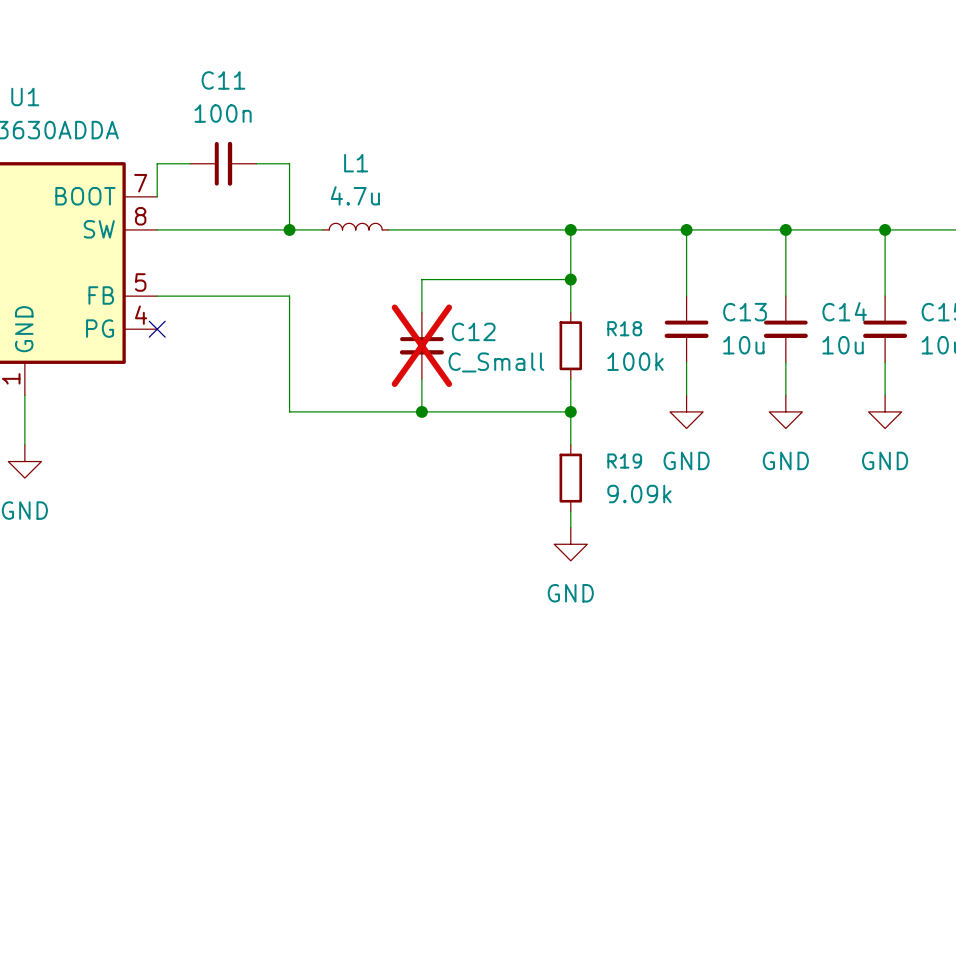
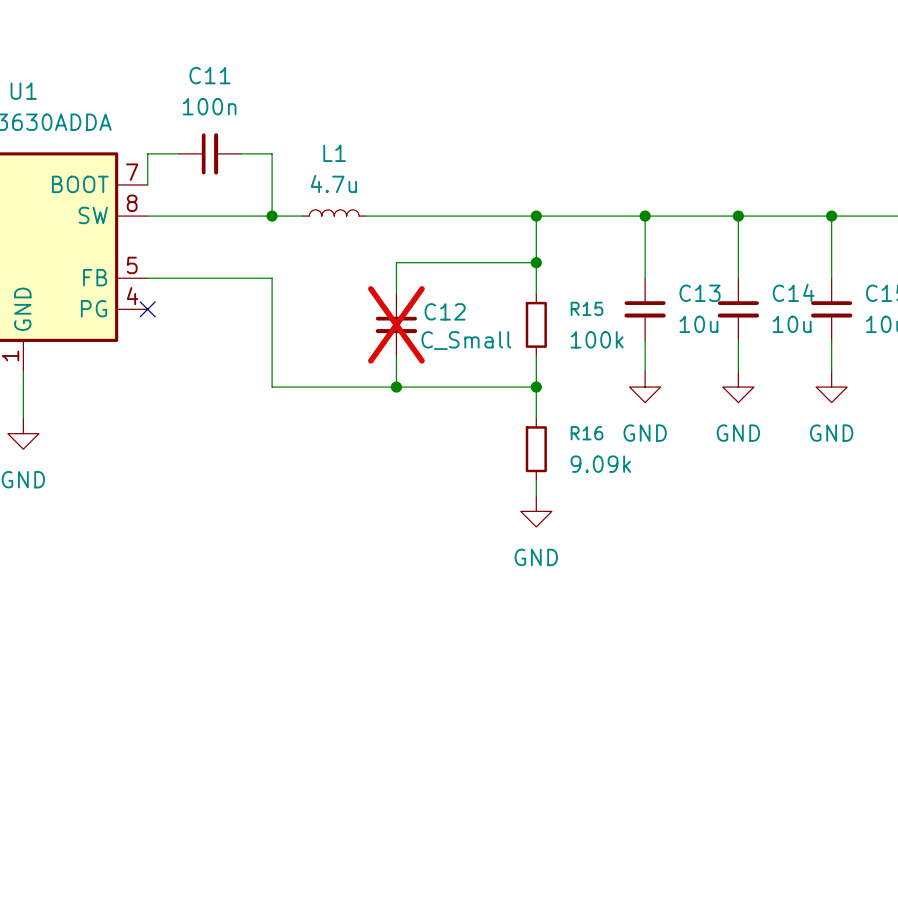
R18 name: R18 (624, 328) -> R15 (586, 308)
R19 name: R19 (624, 461) -> R16 (586, 433)

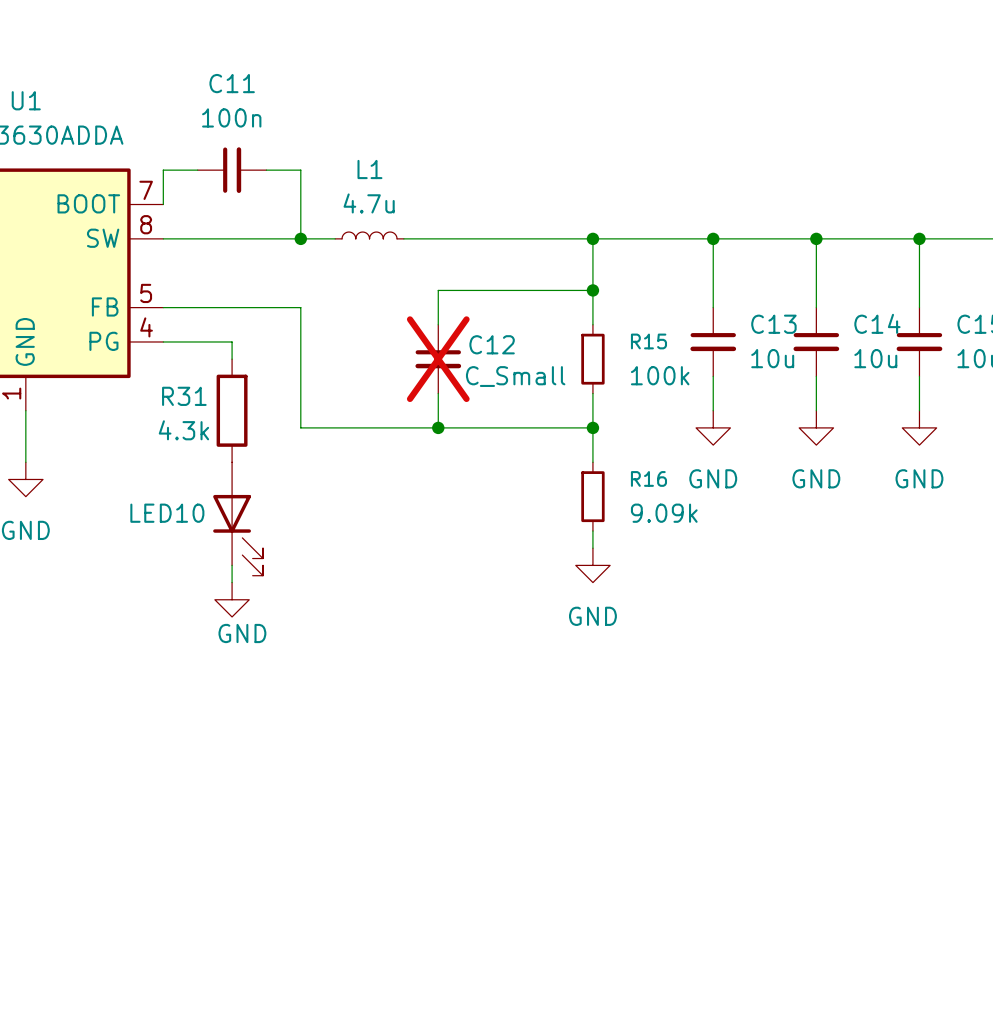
wire: none -> (163, 341) (232, 341) (232, 359)
no-connect mark: (147, 309) -> none
R31: none -> 4.3k (232, 410)
LED10: none -> (238, 519)
wire: none -> (232, 565) (232, 582)
power symbol: none -> GND (232, 599)

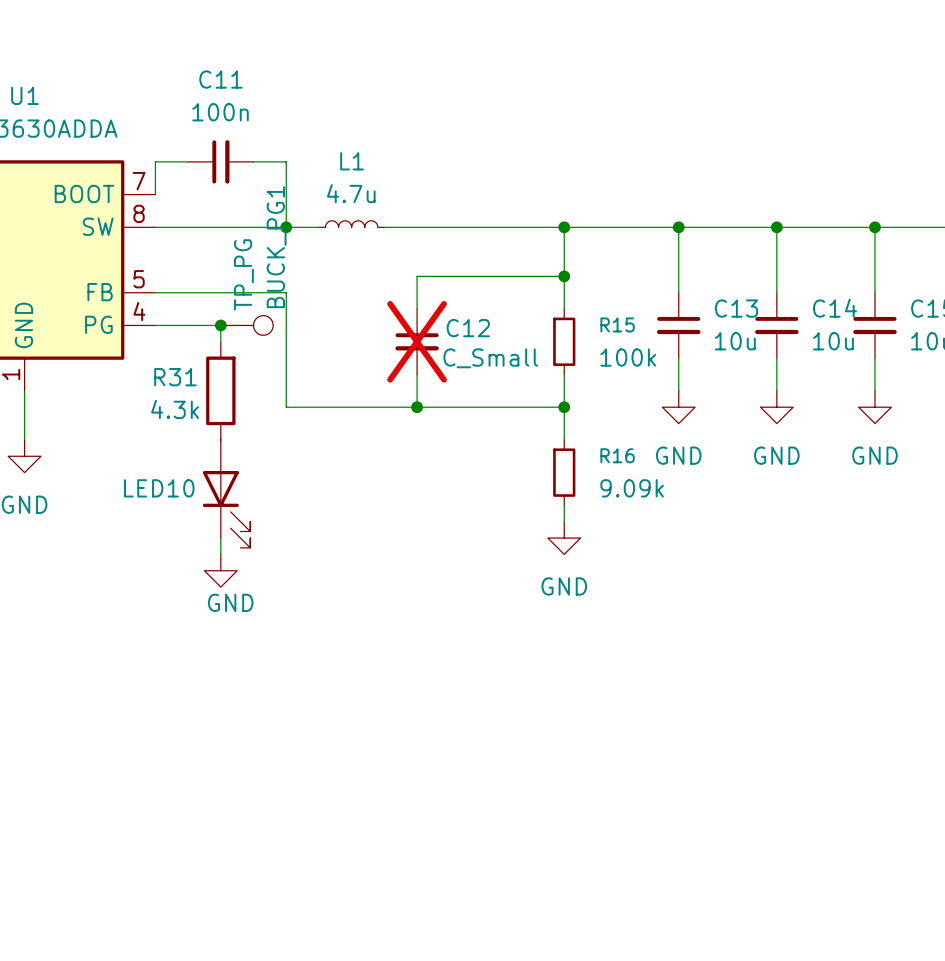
junction: none -> (220, 325)
BUCK_PG1: none -> TP_PG (247, 325)

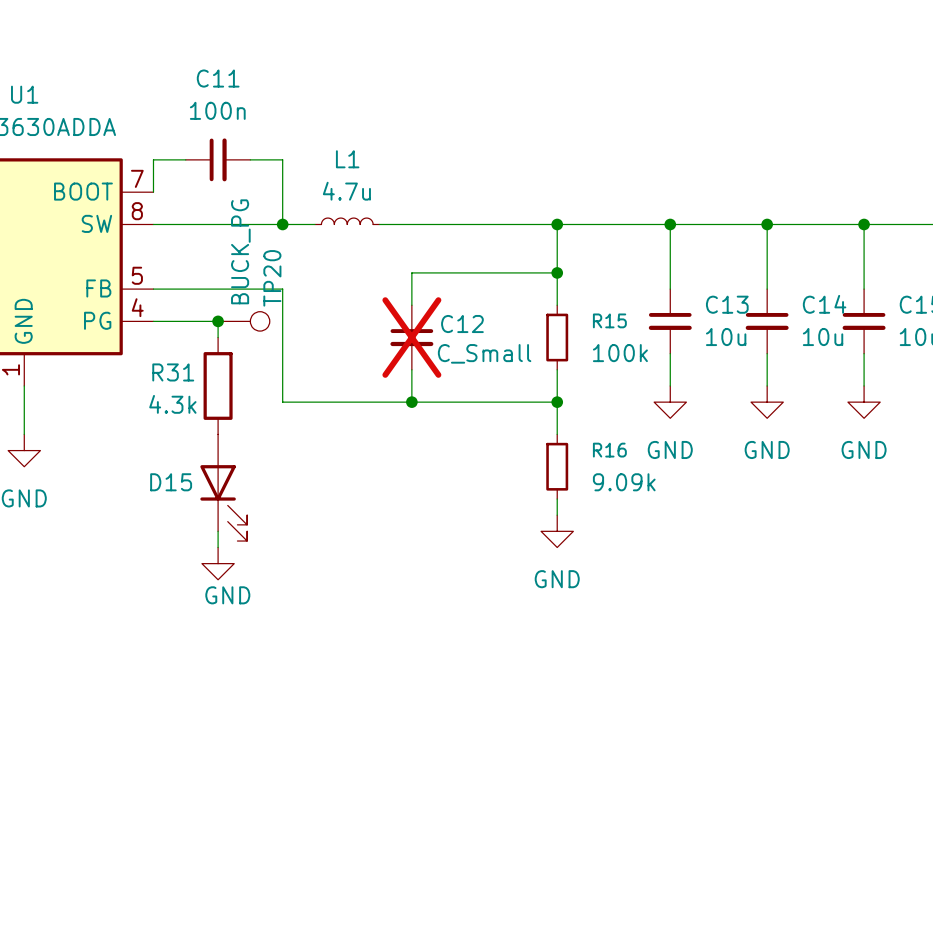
BUCK_PG1 name: BUCK_PG1 (276, 247) -> TP20 (272, 278)
BUCK_PG1 value: TP_PG (243, 274) -> BUCK_PG (240, 251)
LED10 name: LED10 (159, 488) -> D15 (171, 482)

